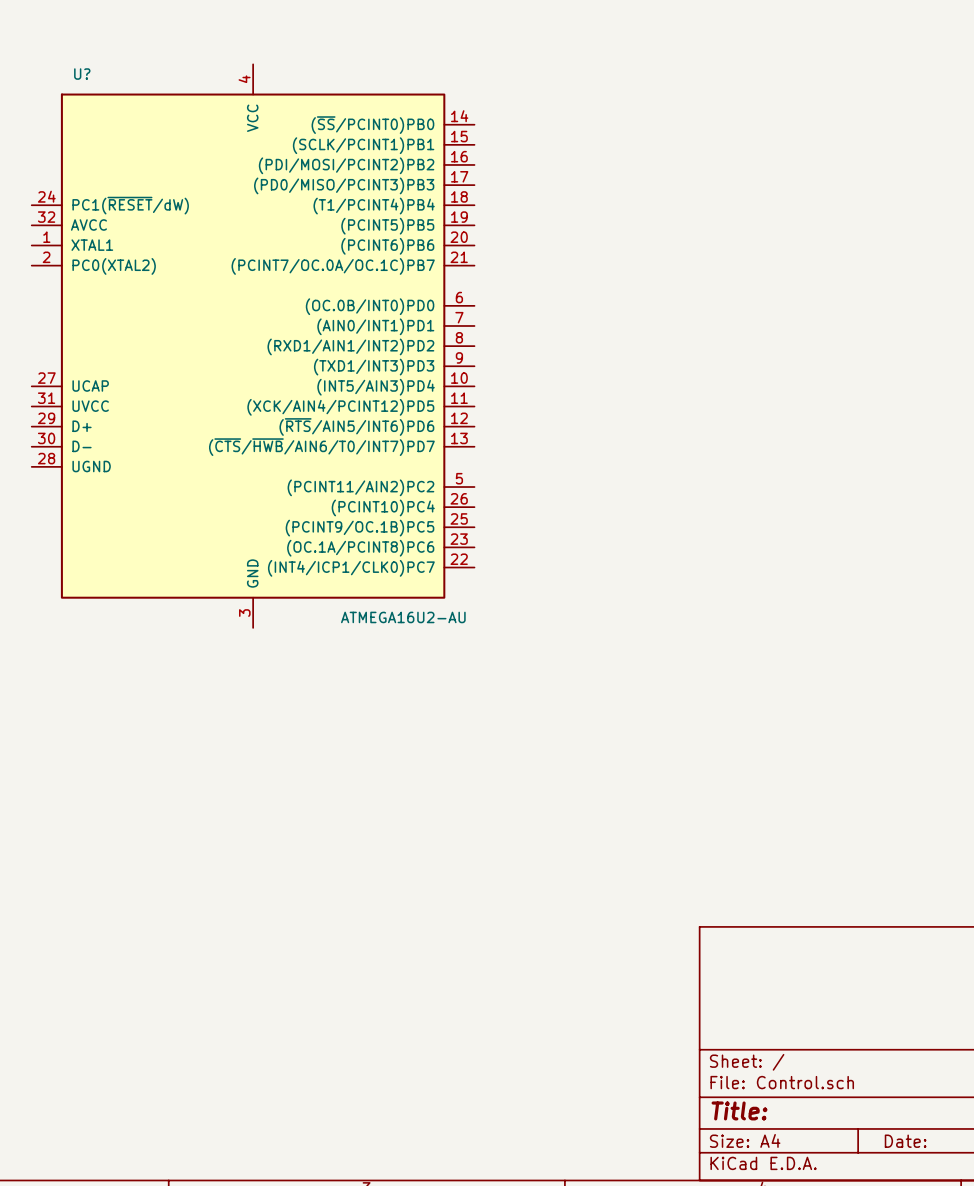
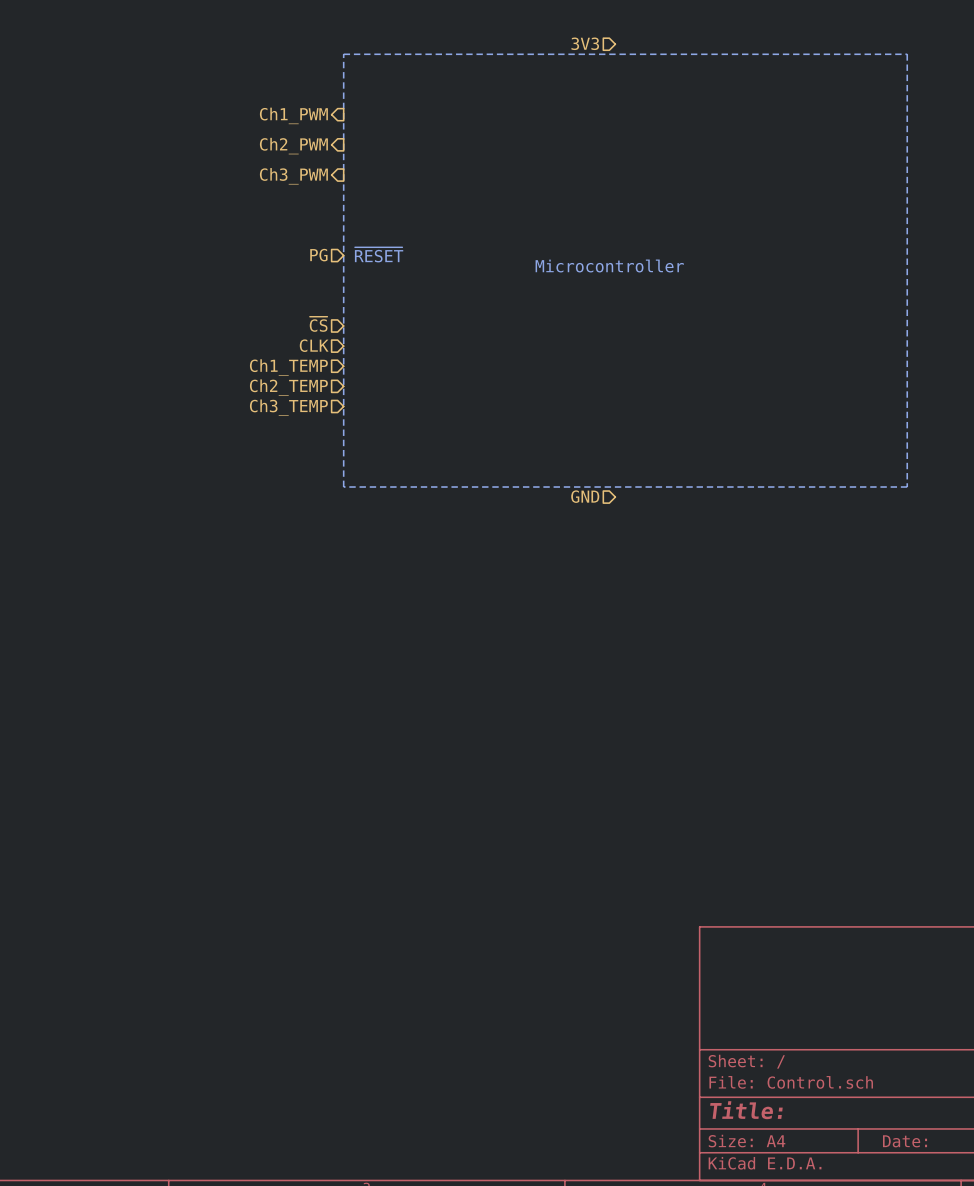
hierarchical label: none -> 3V3 (585, 43)
line: none -> (343, 54) (907, 54) (907, 487) (343, 487) (343, 54)
hierarchical label: none -> Ch1_PWM (293, 115)
hierarchical label: none -> Ch2_PWM (293, 146)
hierarchical label: none -> Ch3_PWM (293, 176)
text: none -> ~{RESET} (379, 254)
hierarchical label: none -> PG (318, 255)
text: none -> Microcontroller (609, 266)
hierarchical label: none -> ~{CS} (318, 324)
hierarchical label: none -> CLK (314, 345)
U?: ATMEGA16U2-AU (253, 346) -> none
hierarchical label: none -> Ch1_TEMP (288, 367)
hierarchical label: none -> Ch2_TEMP (288, 387)
hierarchical label: none -> Ch3_TEMP (288, 407)
hierarchical label: none -> GND (585, 496)

